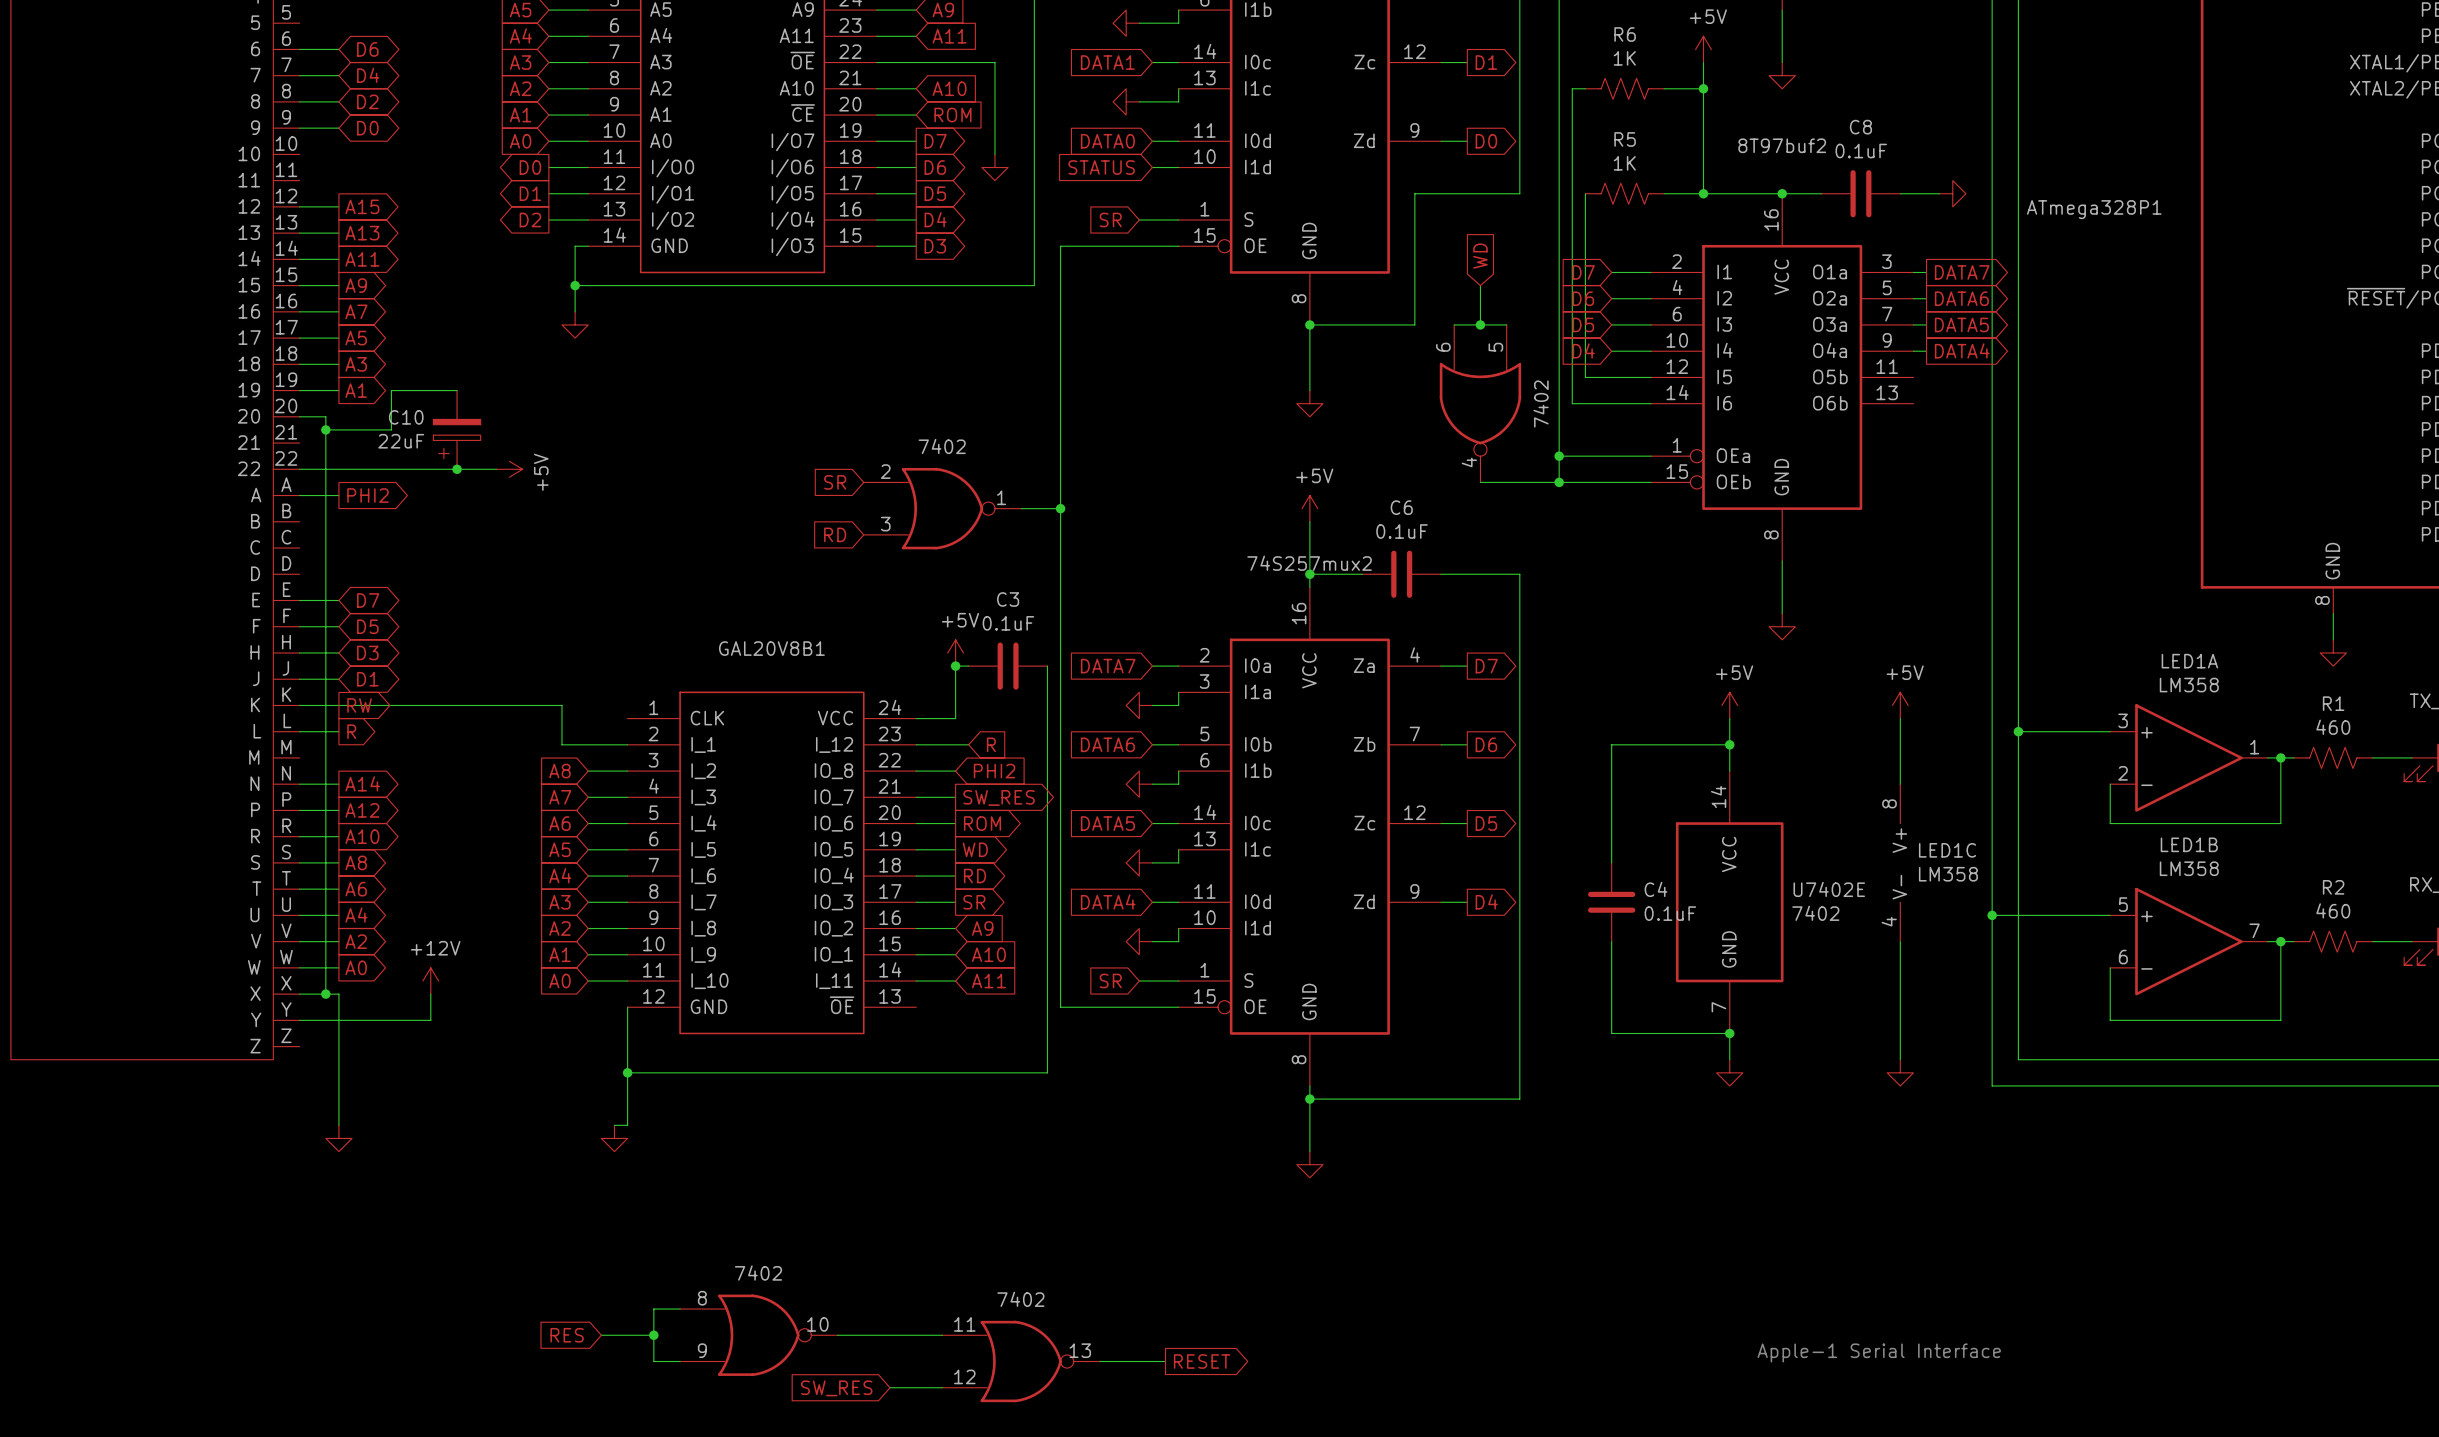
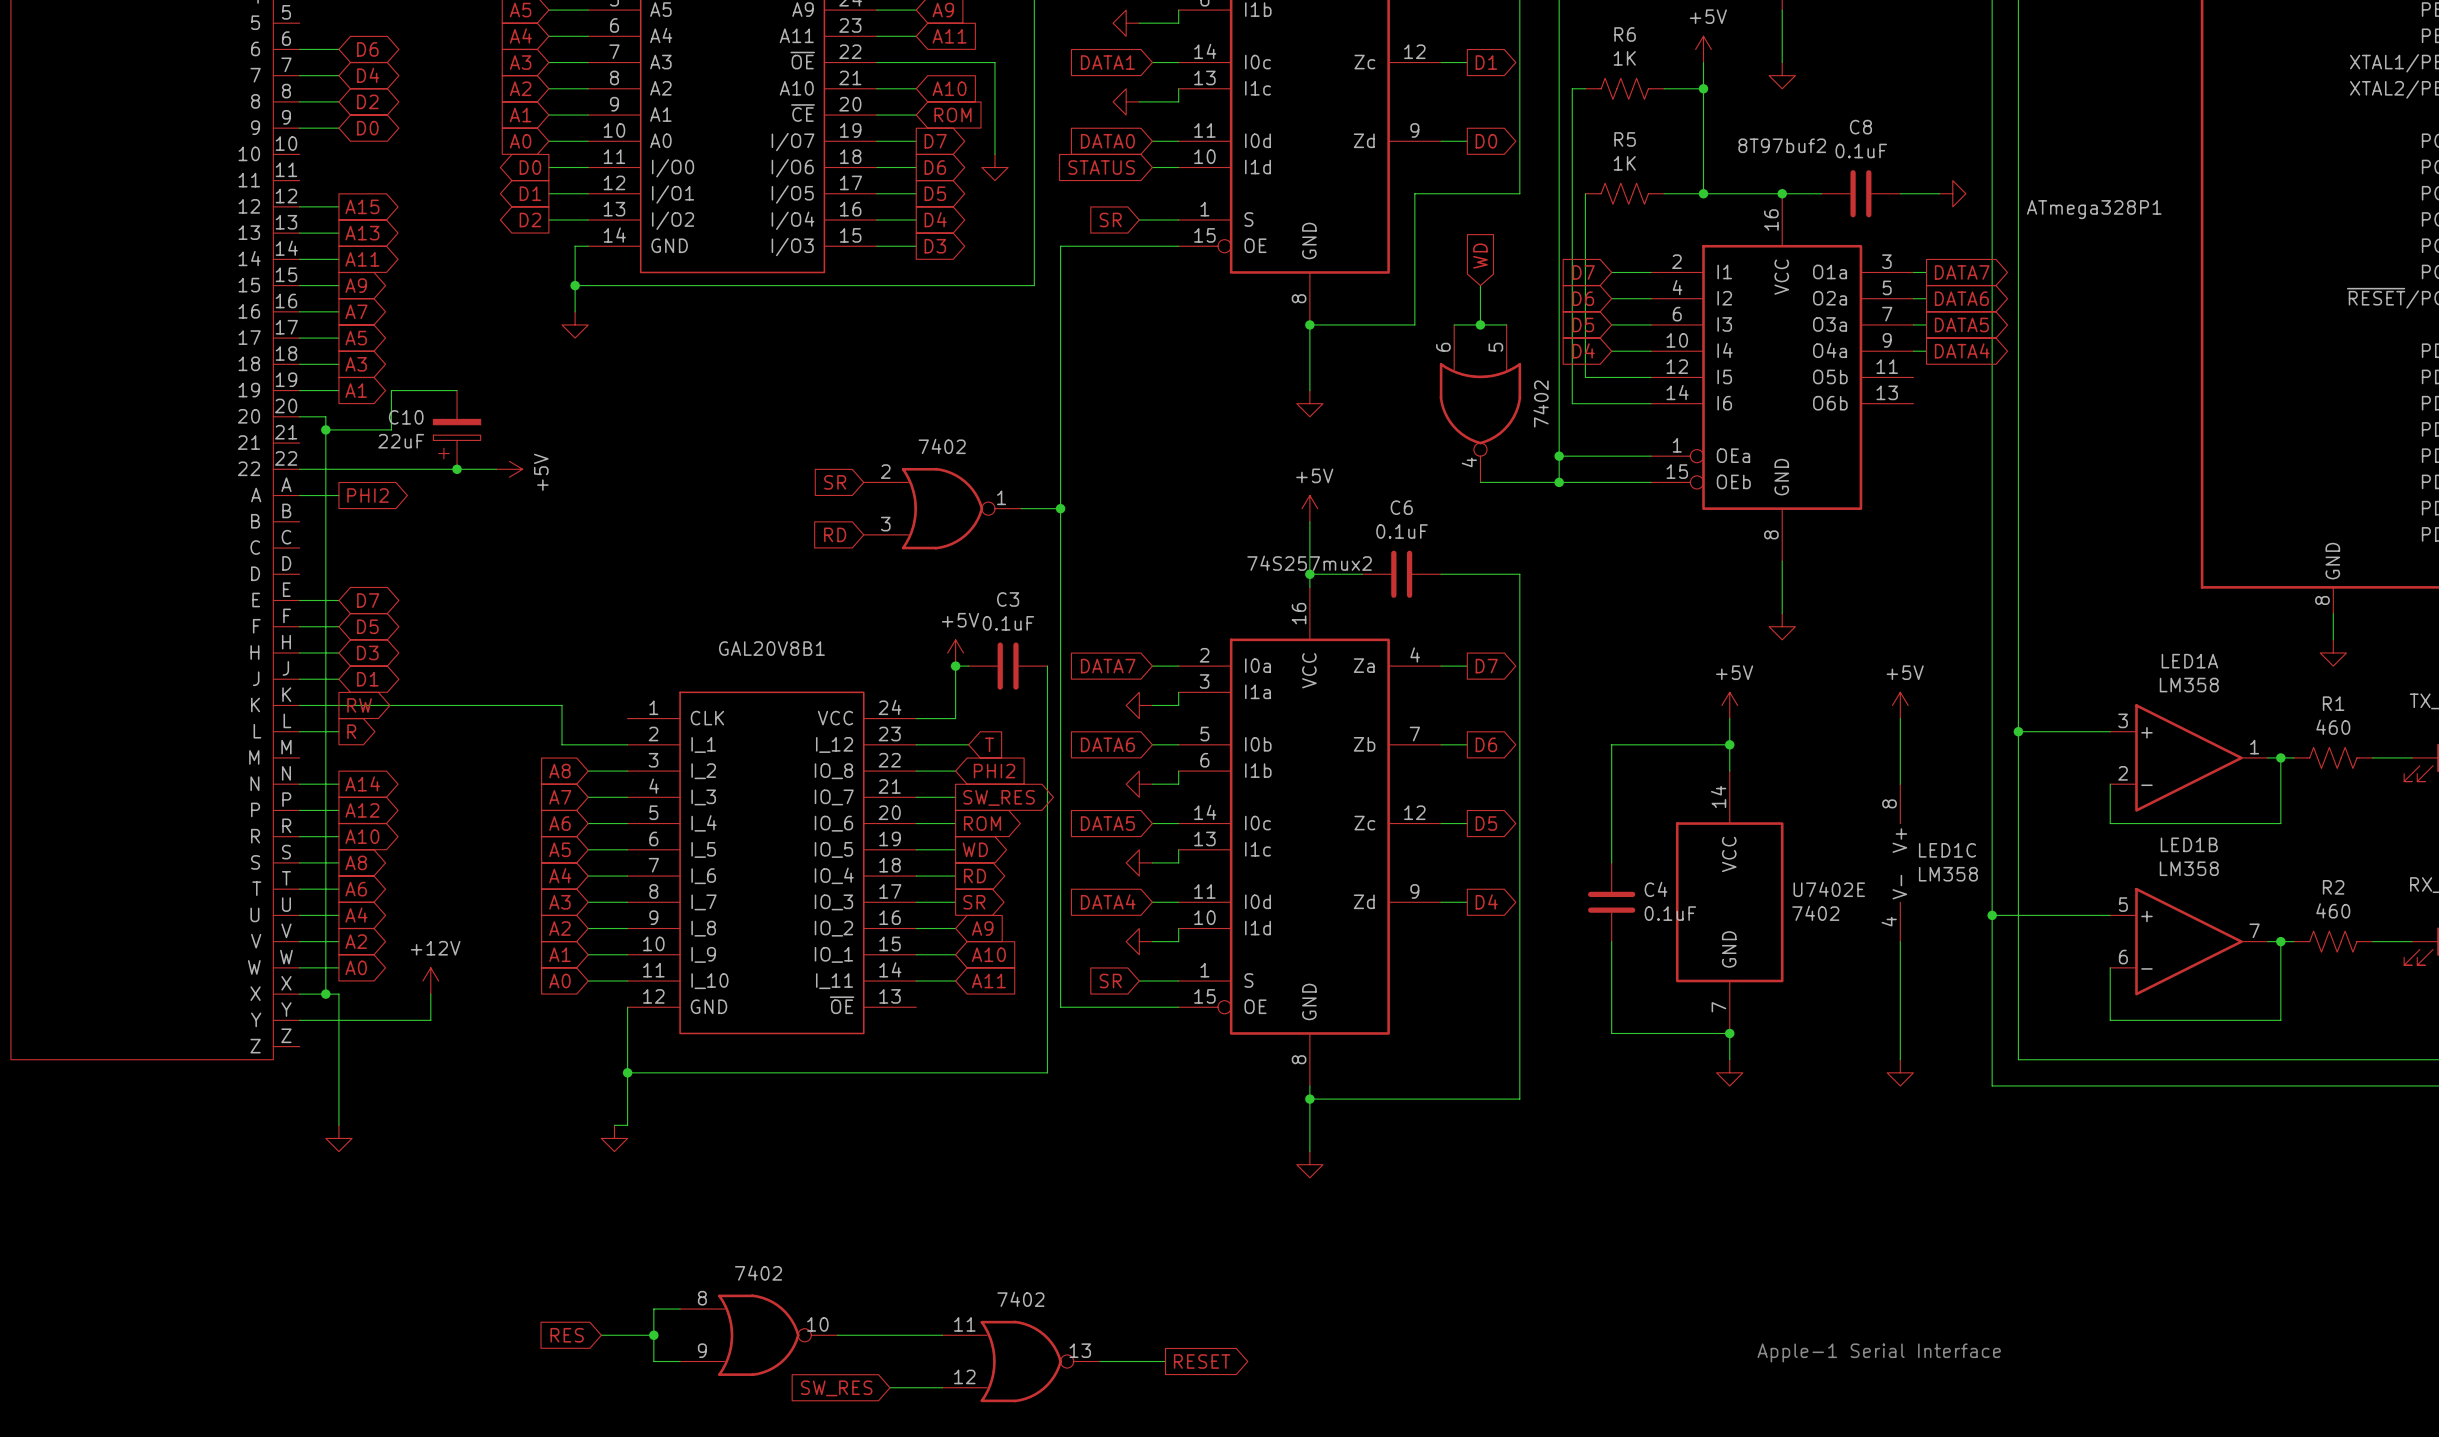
global label: R (991, 744) -> T (989, 744)

